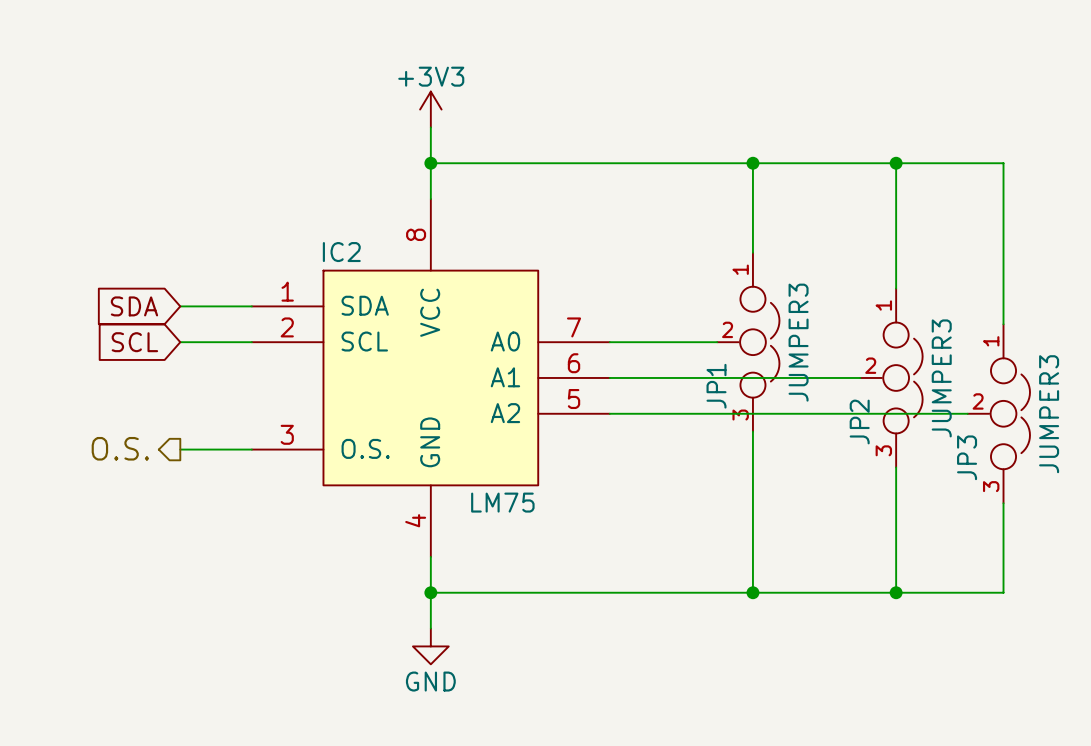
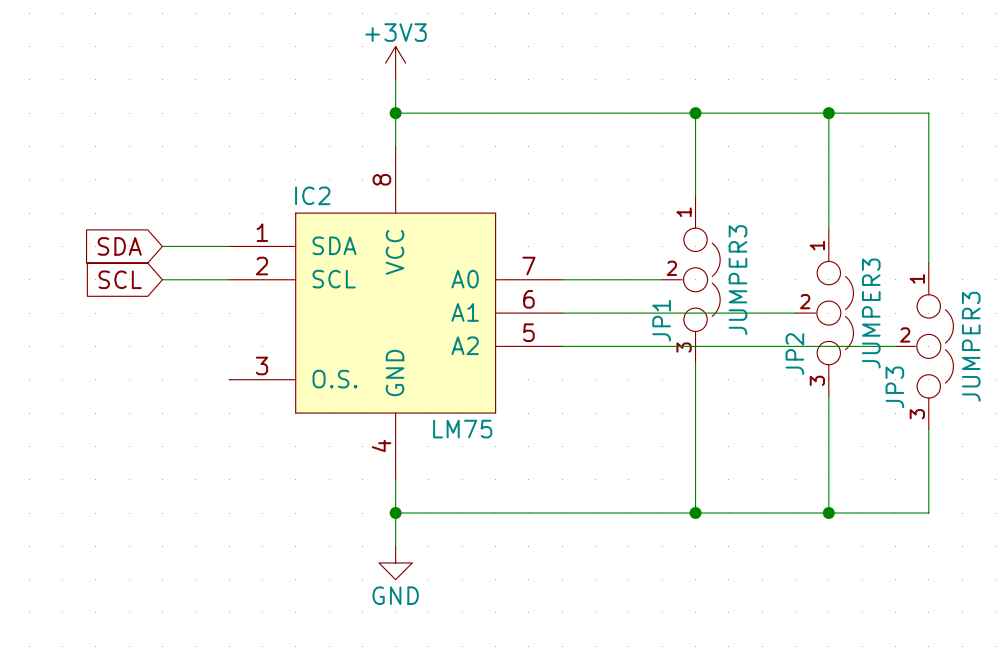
hierarchical label: O.S. (120, 448) -> none
wire: (180, 449) (251, 449) -> none

